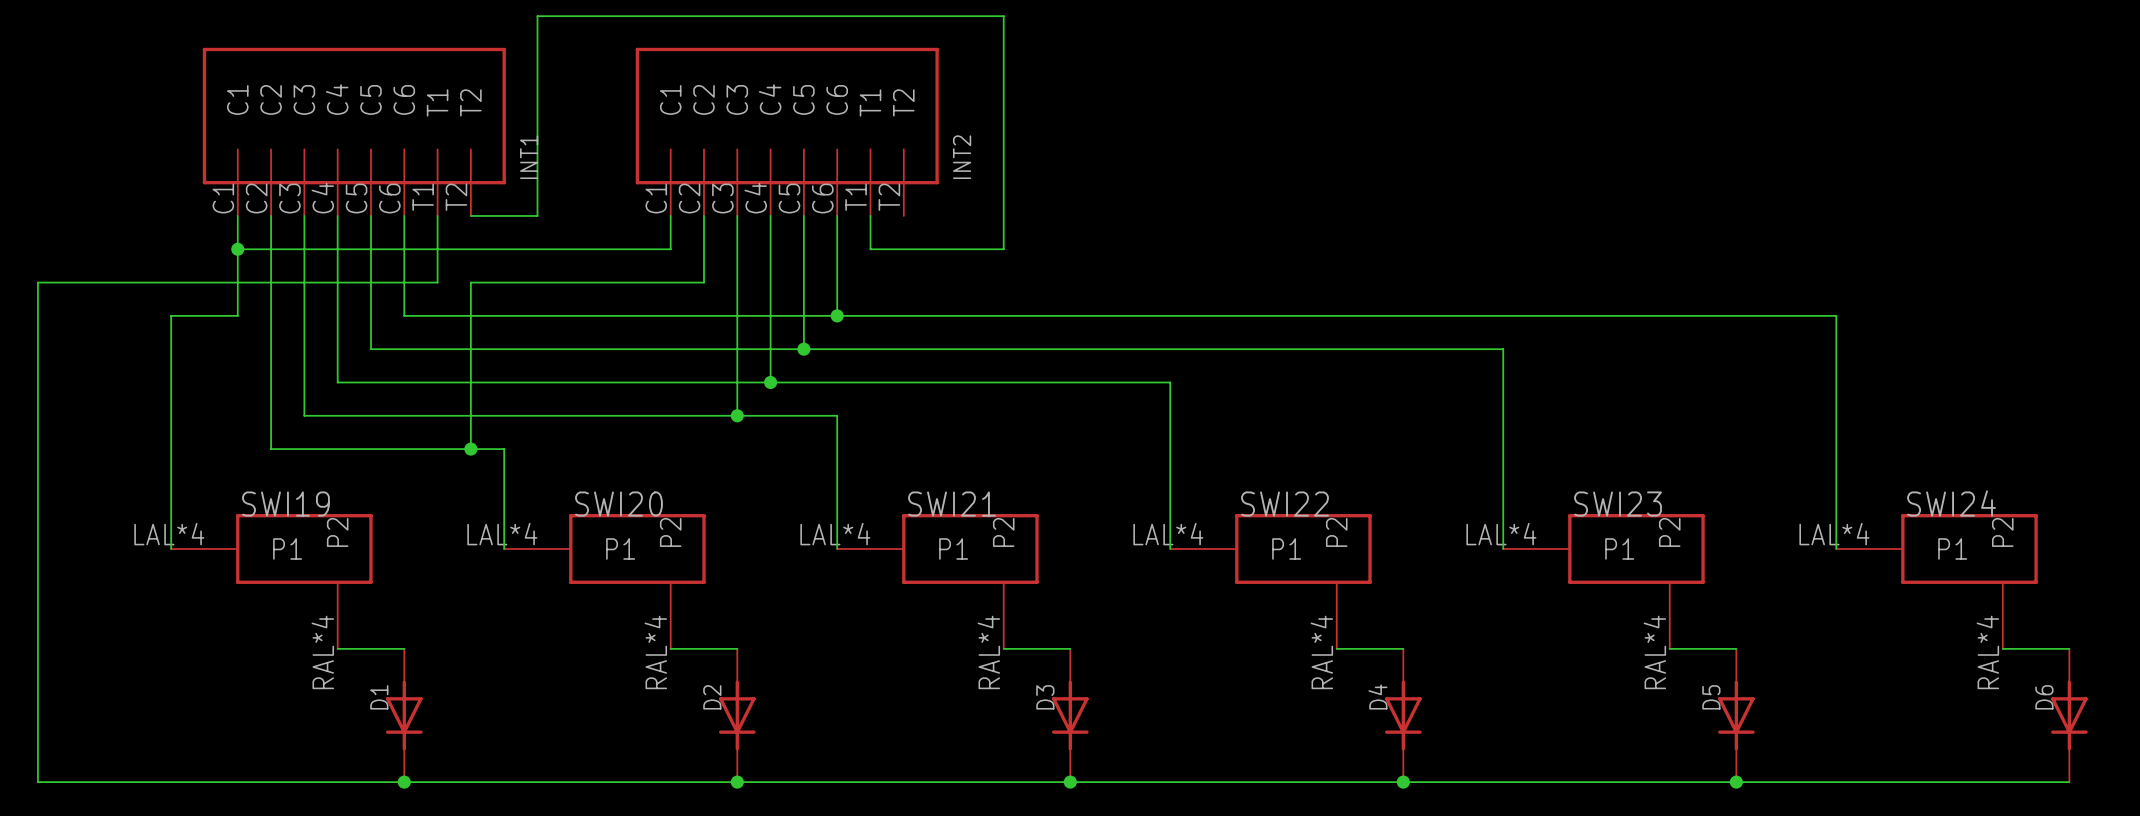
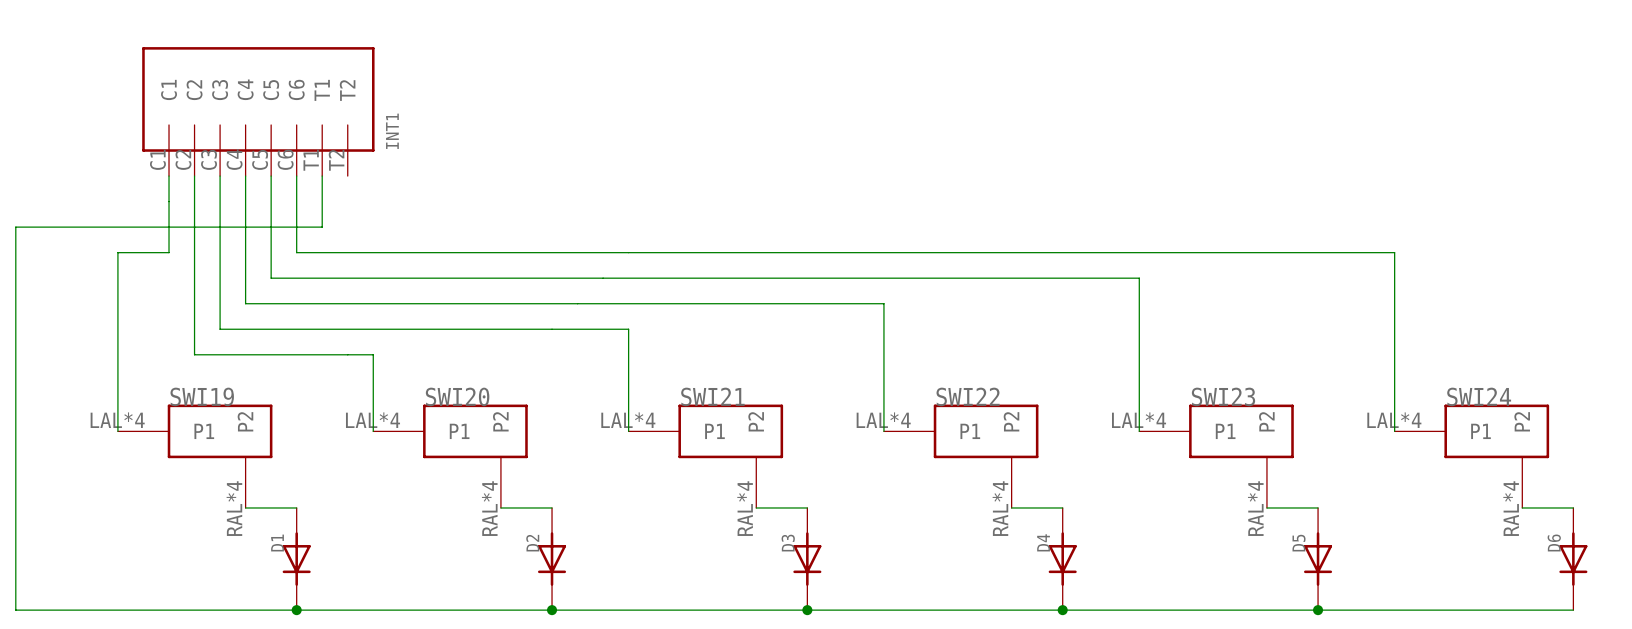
INT2: (787, 131) -> none
wire: (470, 215) (537, 215) (537, 16) (1003, 16) (1003, 249) (870, 249) (870, 215) -> none
wire: (670, 215) (670, 249) (237, 249) -> none
wire: (704, 215) (704, 282) (470, 282) (470, 449) -> none
wire: (737, 215) (737, 415) -> none
wire: (770, 215) (770, 382) -> none
wire: (803, 215) (803, 349) -> none
wire: (837, 215) (837, 315) -> none
junction: (237, 249) -> none
junction: (837, 315) -> none
junction: (803, 349) -> none
junction: (770, 382) -> none
junction: (737, 415) -> none
junction: (470, 449) -> none

